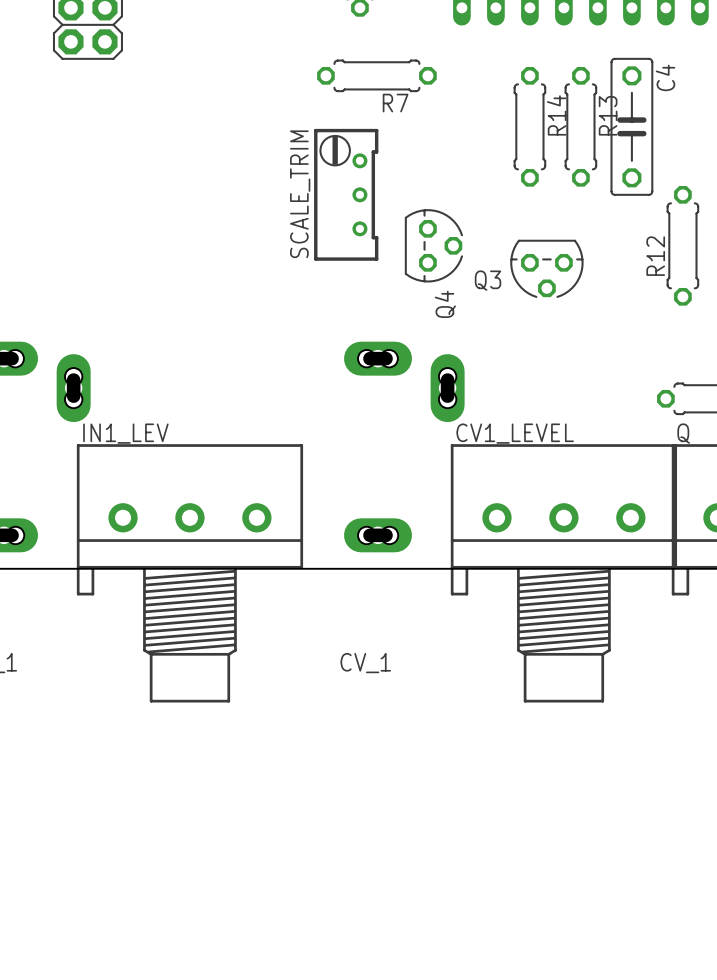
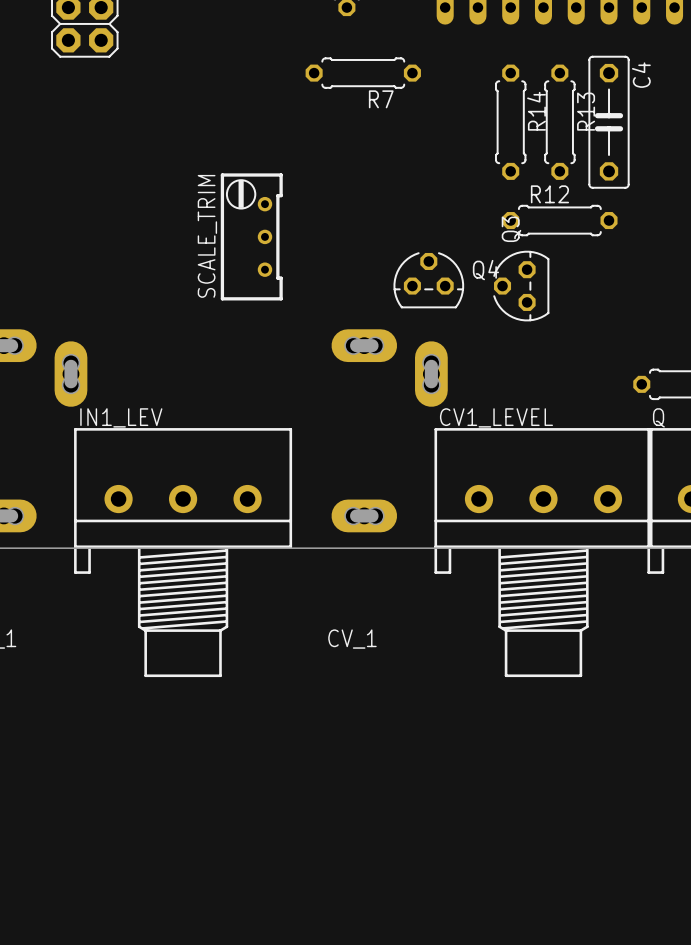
SCALE_TRIM position: (346, 194) -> (251, 236)
Q4 rotation: 0° (433, 245) -> 90° counterclockwise (428, 280)
Q4 position: (433, 245) -> (428, 280)
R12 rotation: 0° (682, 245) -> 90° clockwise (559, 220)
R12 position: (682, 245) -> (559, 220)
Q3 rotation: 0° (546, 268) -> 90° clockwise (521, 286)

